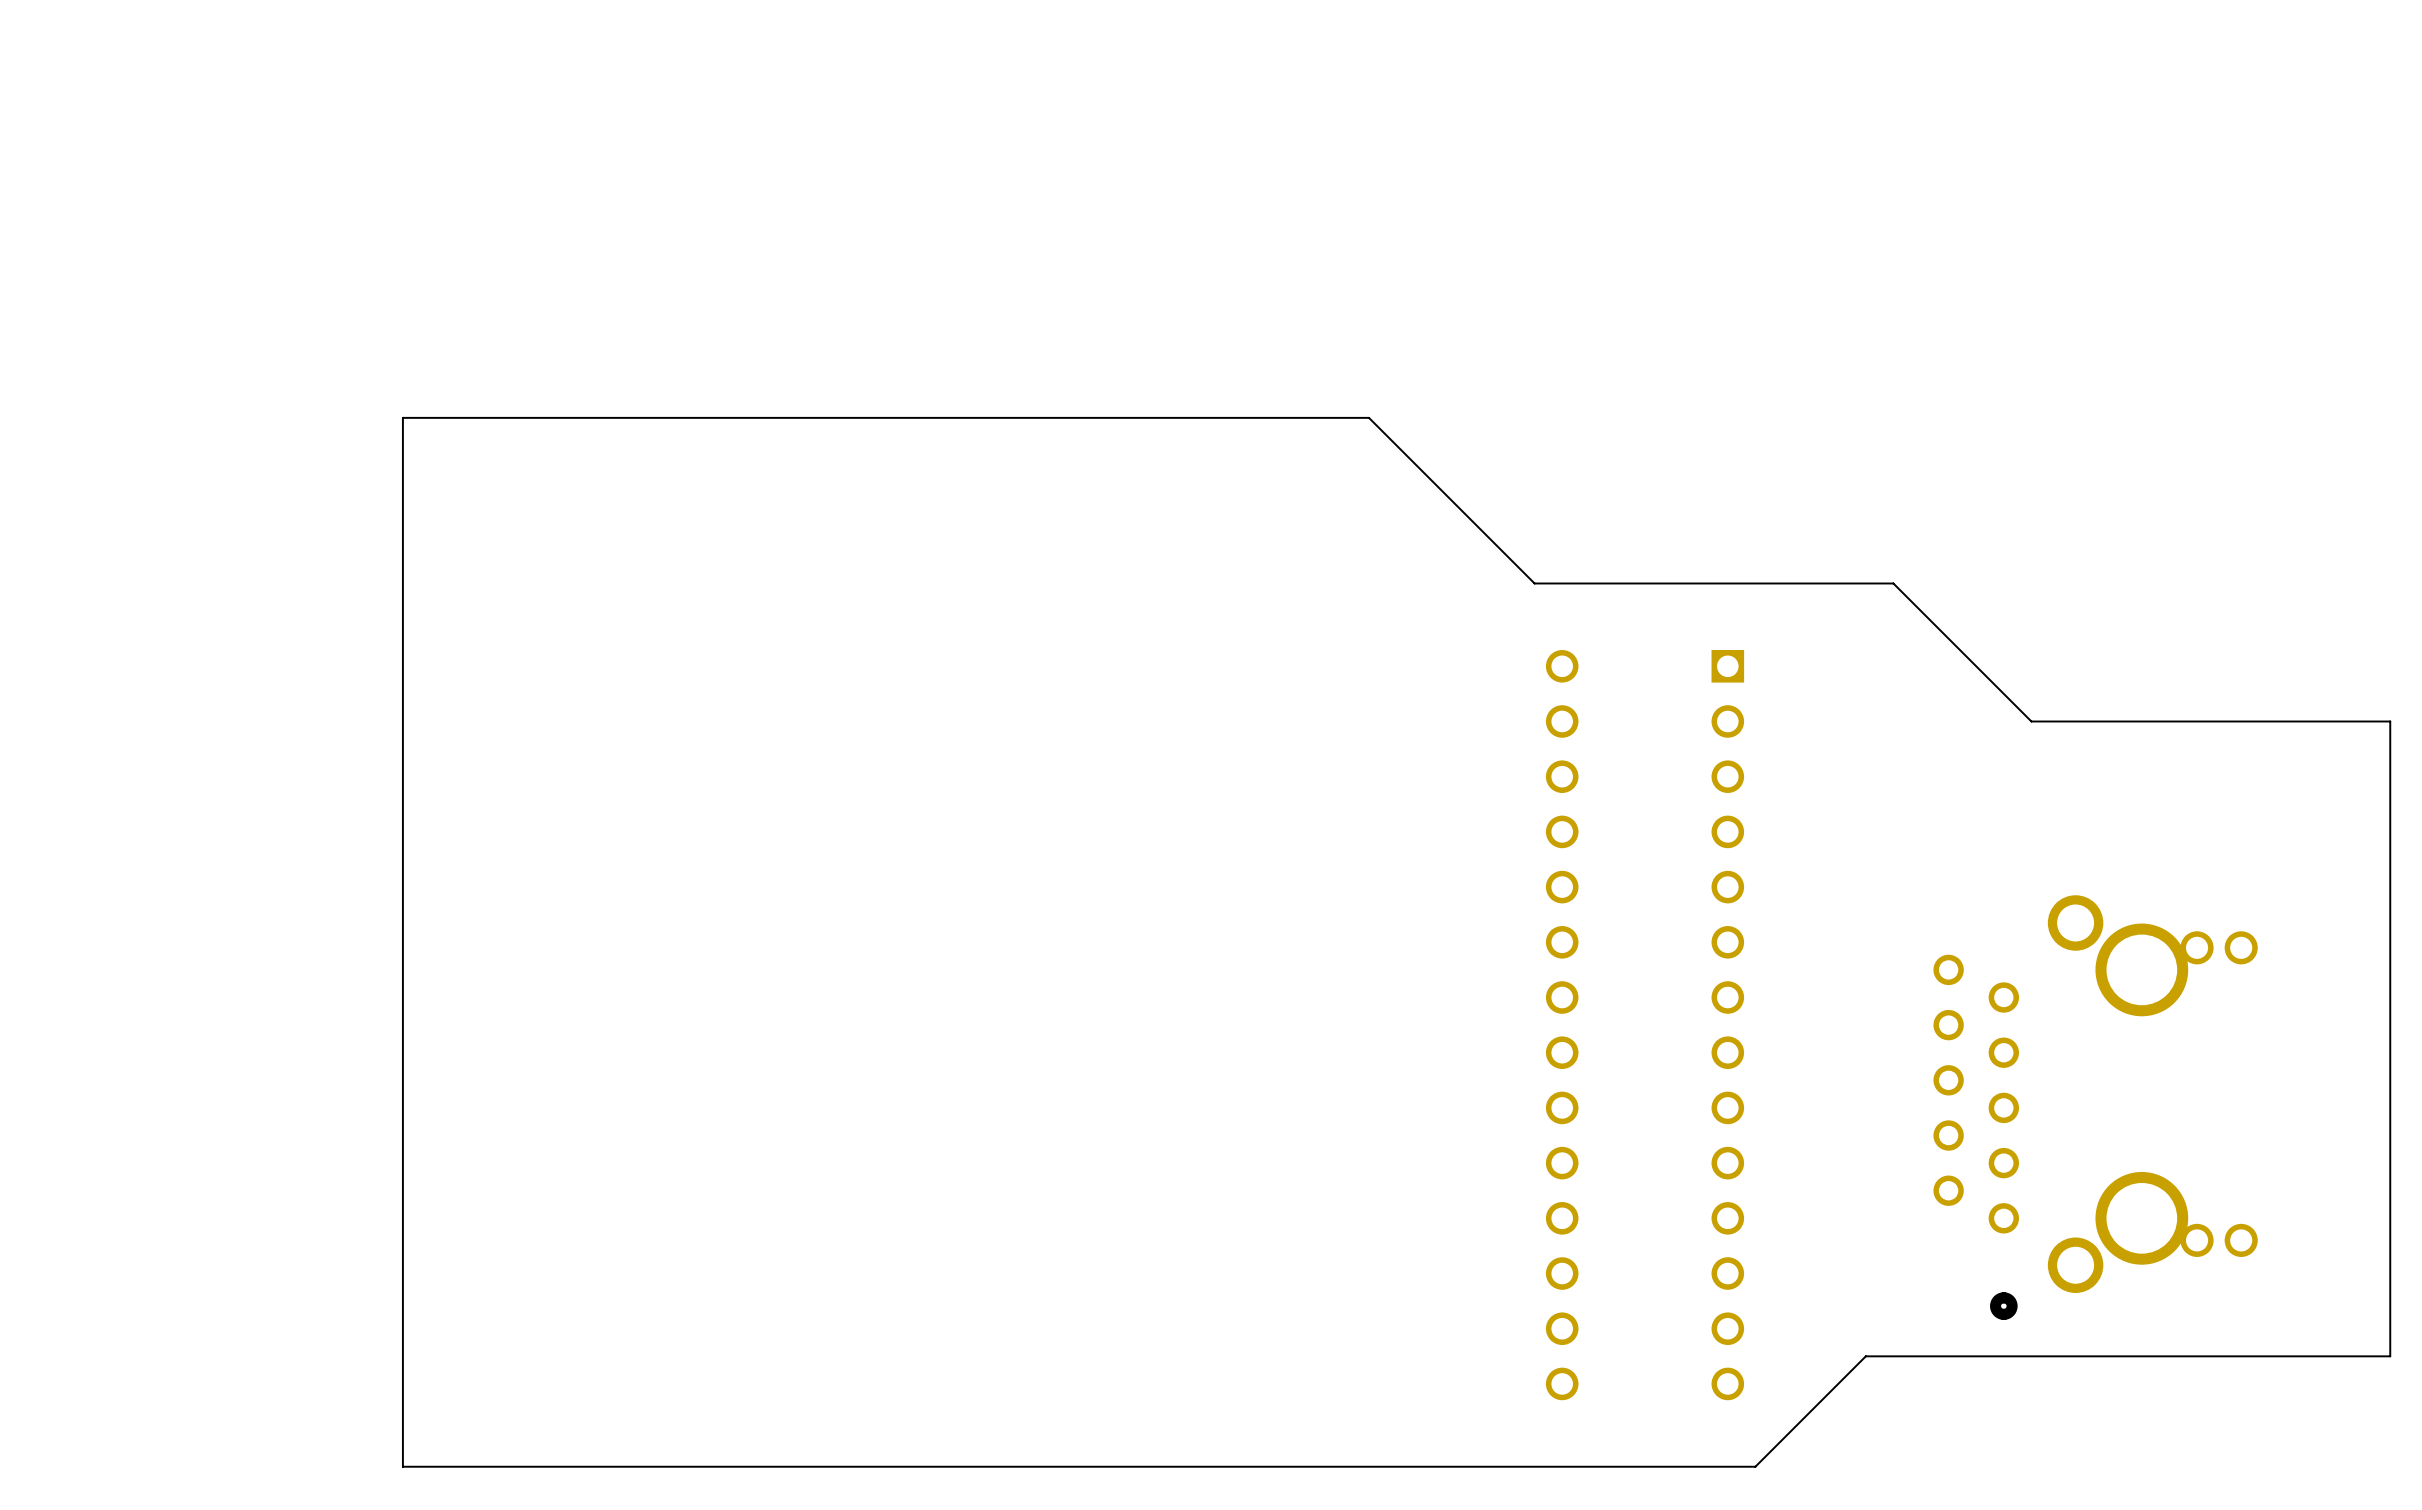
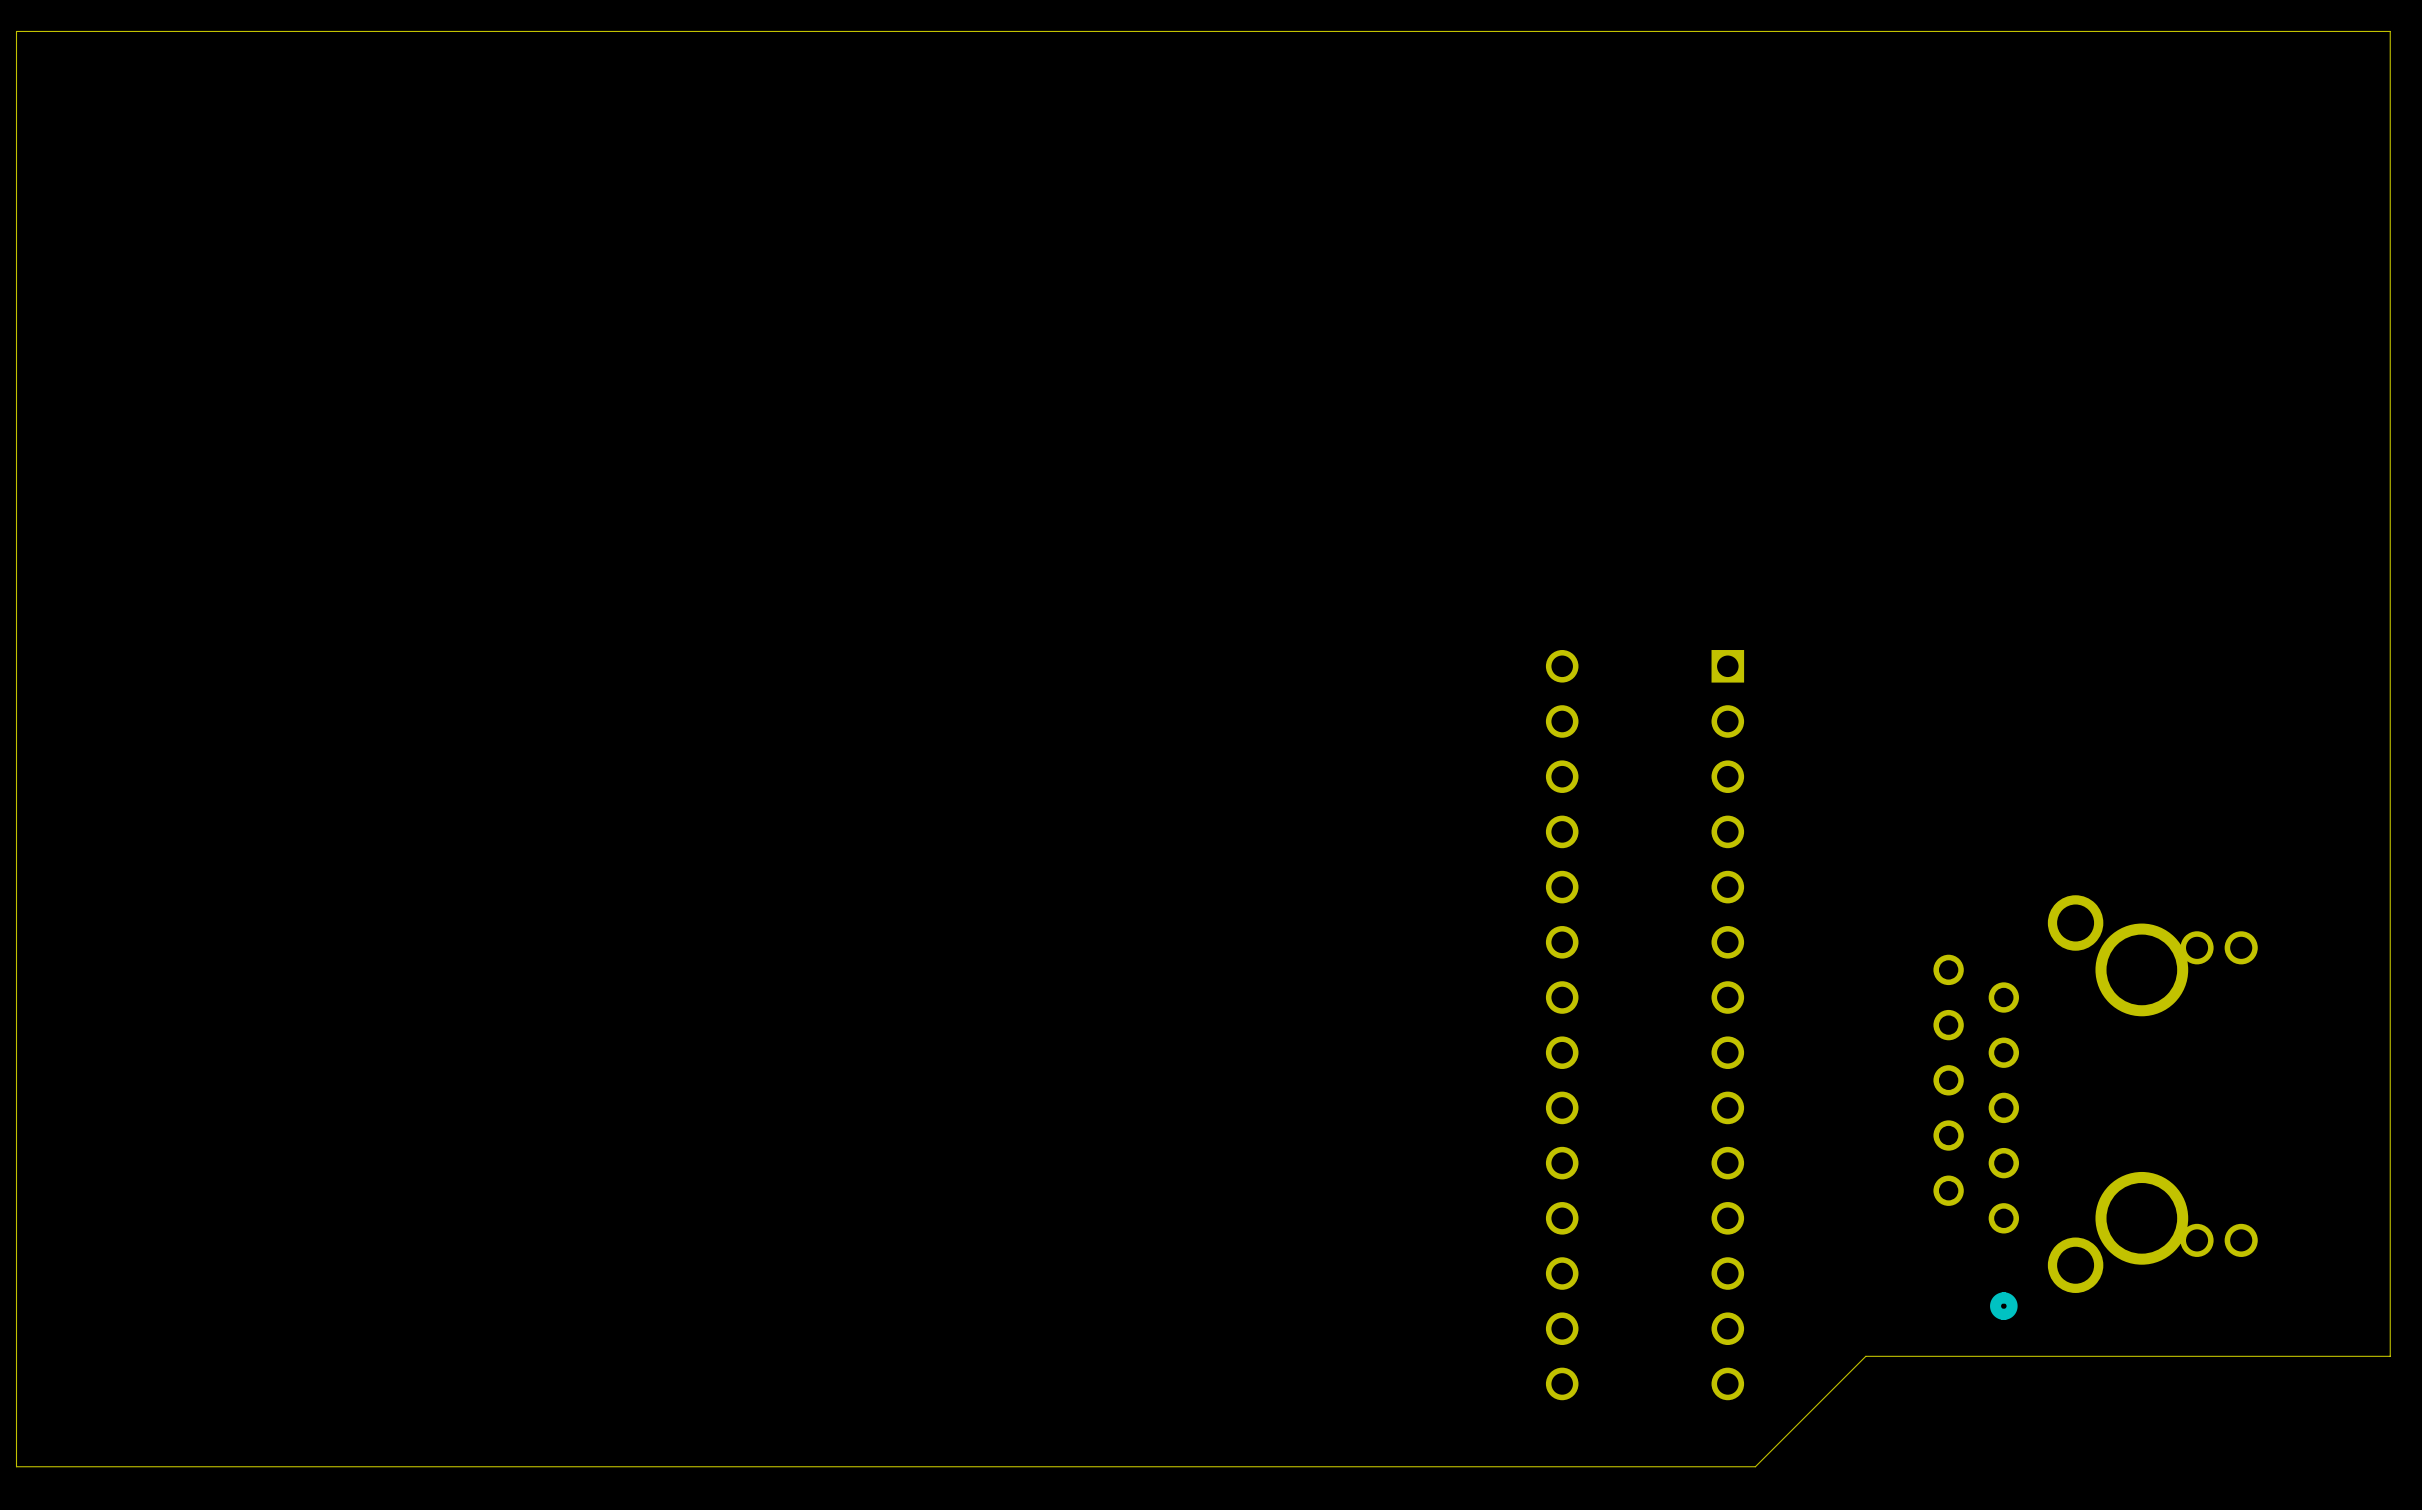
board edge: (2390, 721) (2031, 721) (1893, 583) (1534, 583) (1368, 417) (402, 417) (402, 1466) -> (2390, 721) (2390, 31) (16, 31) (16, 1466) (402, 1466)

